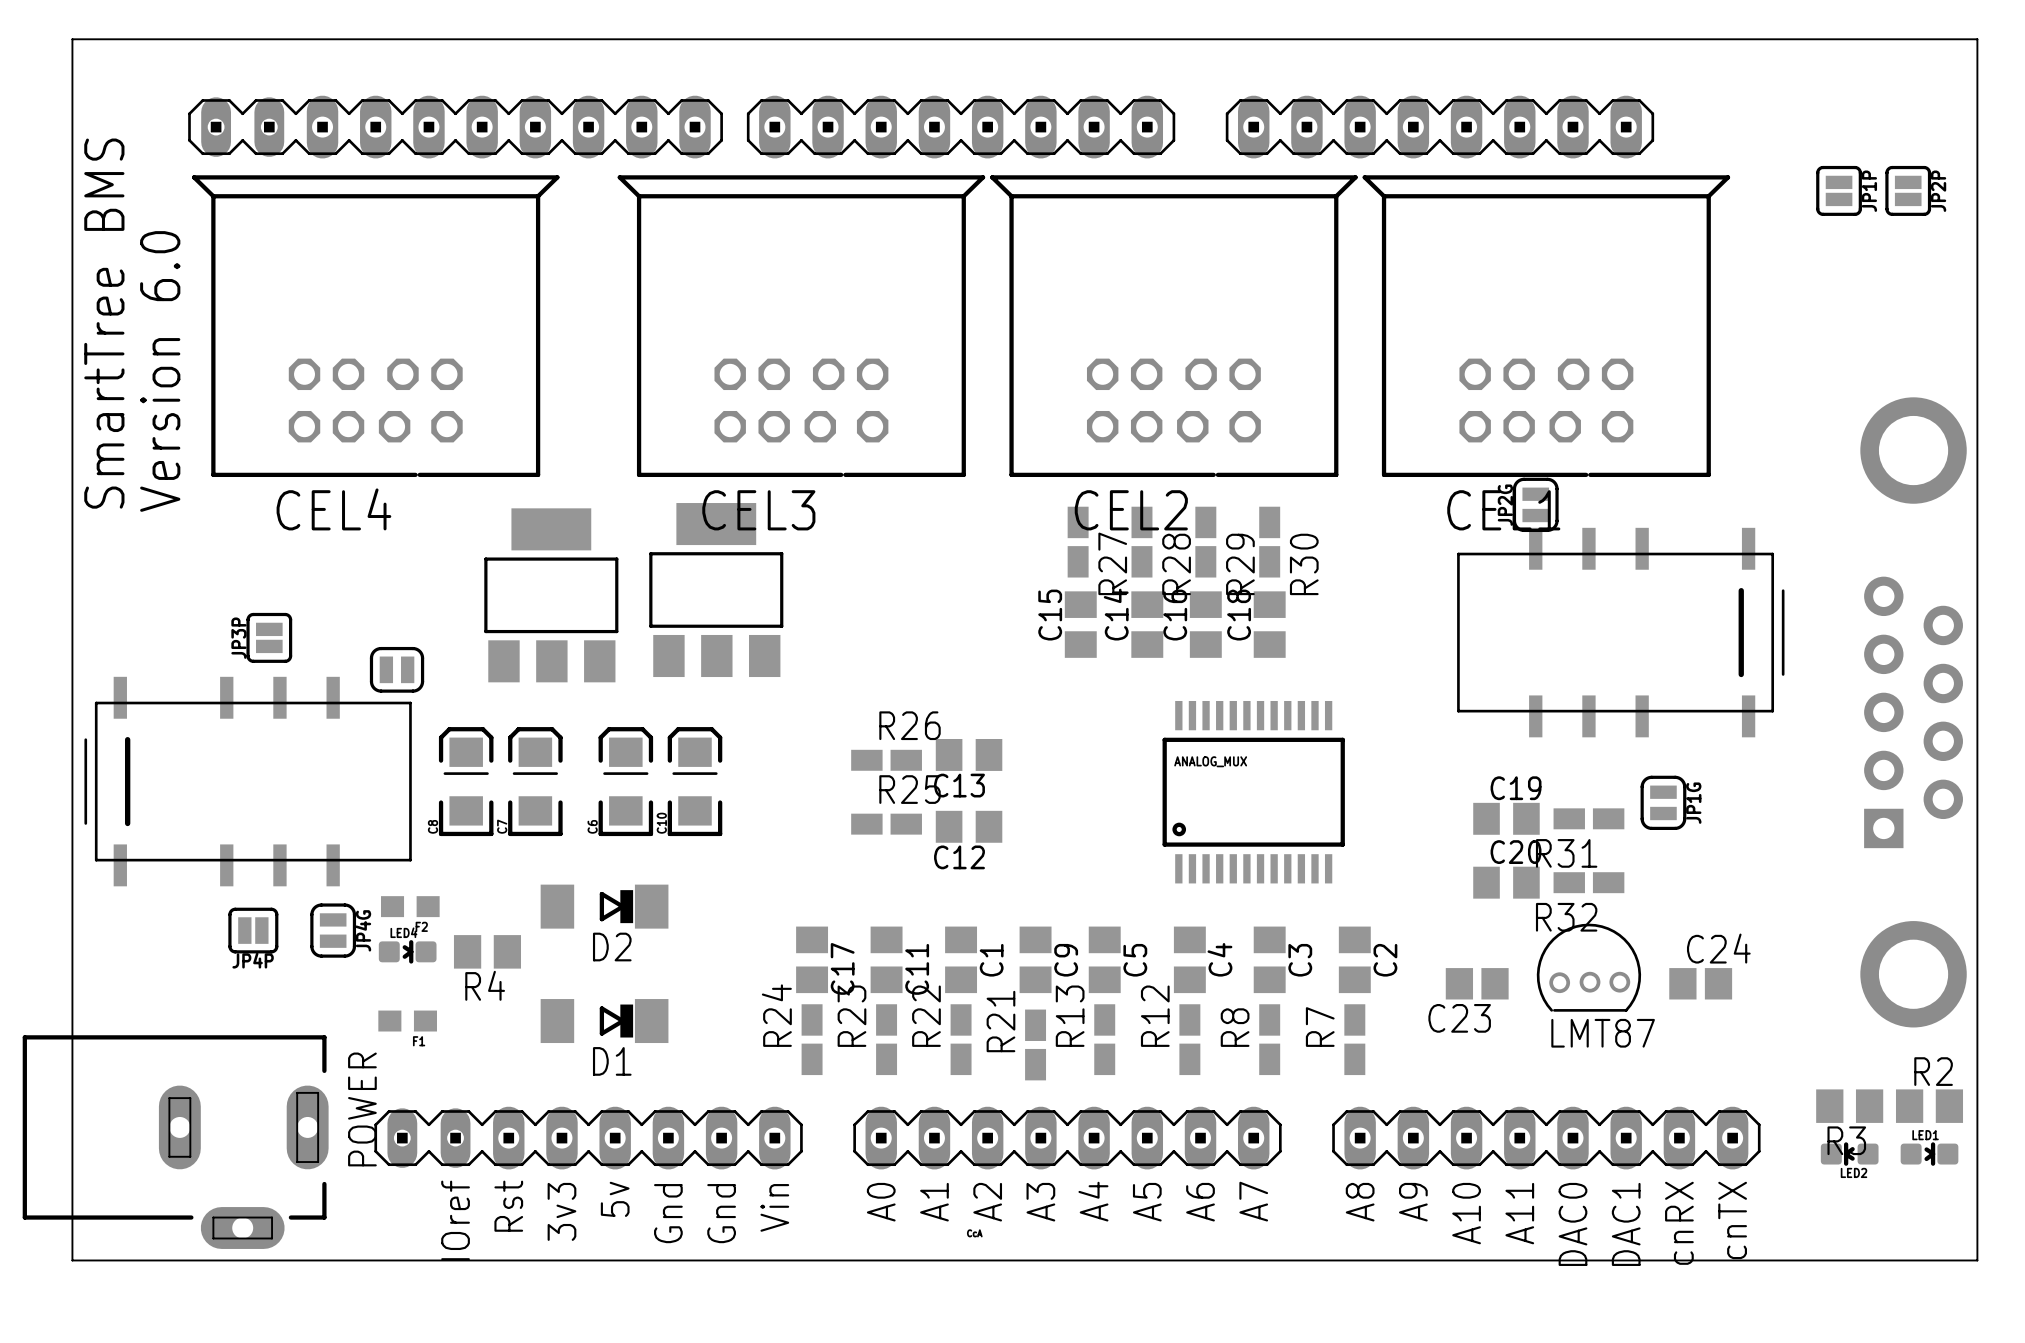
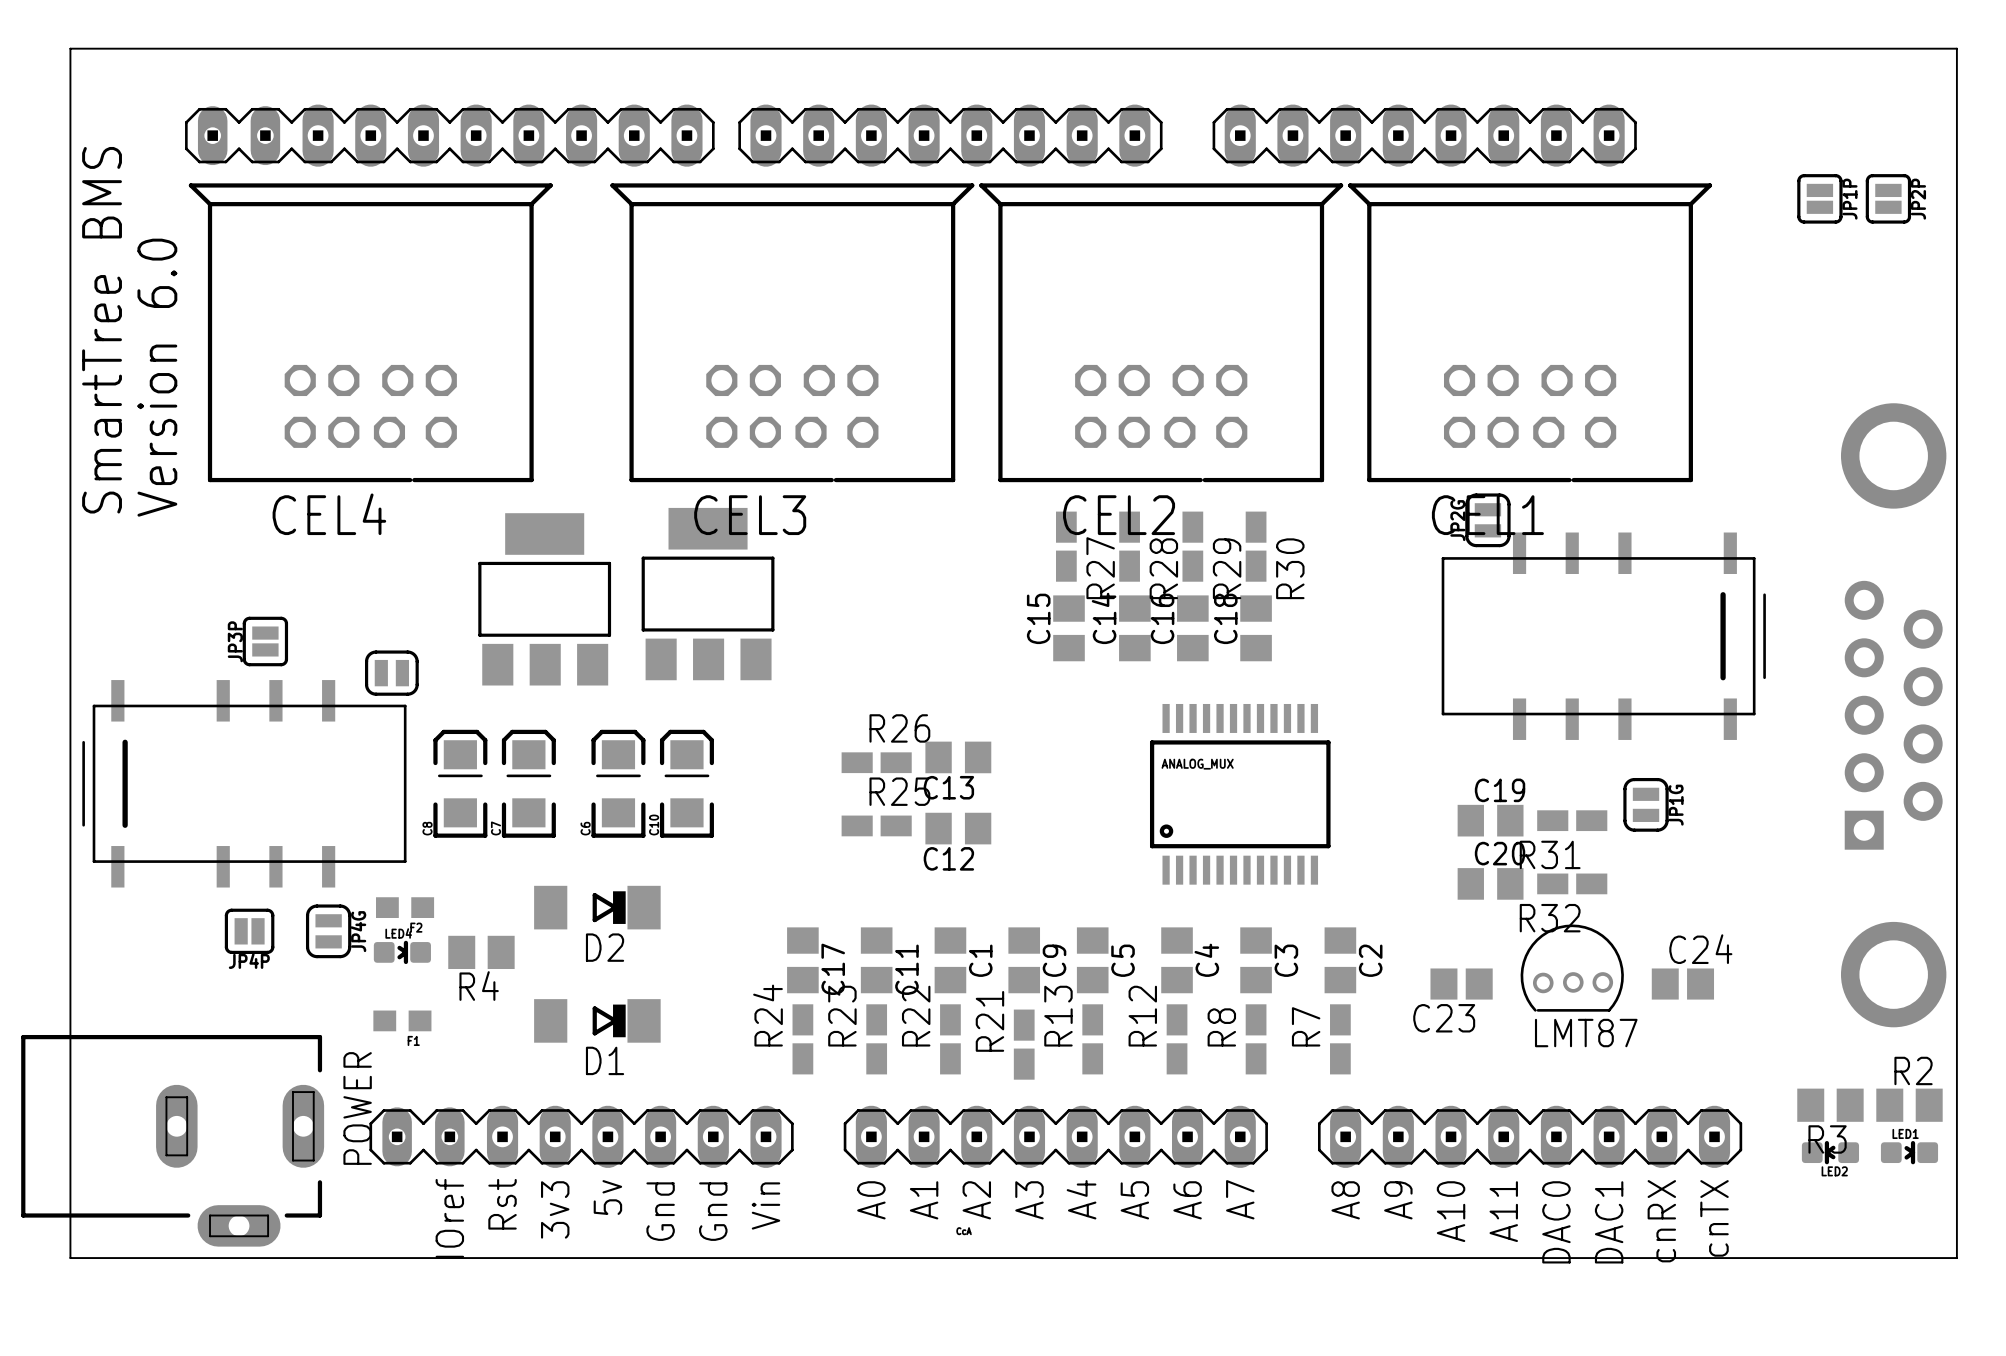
JP2G position: (1535, 504) -> (1487, 520)

